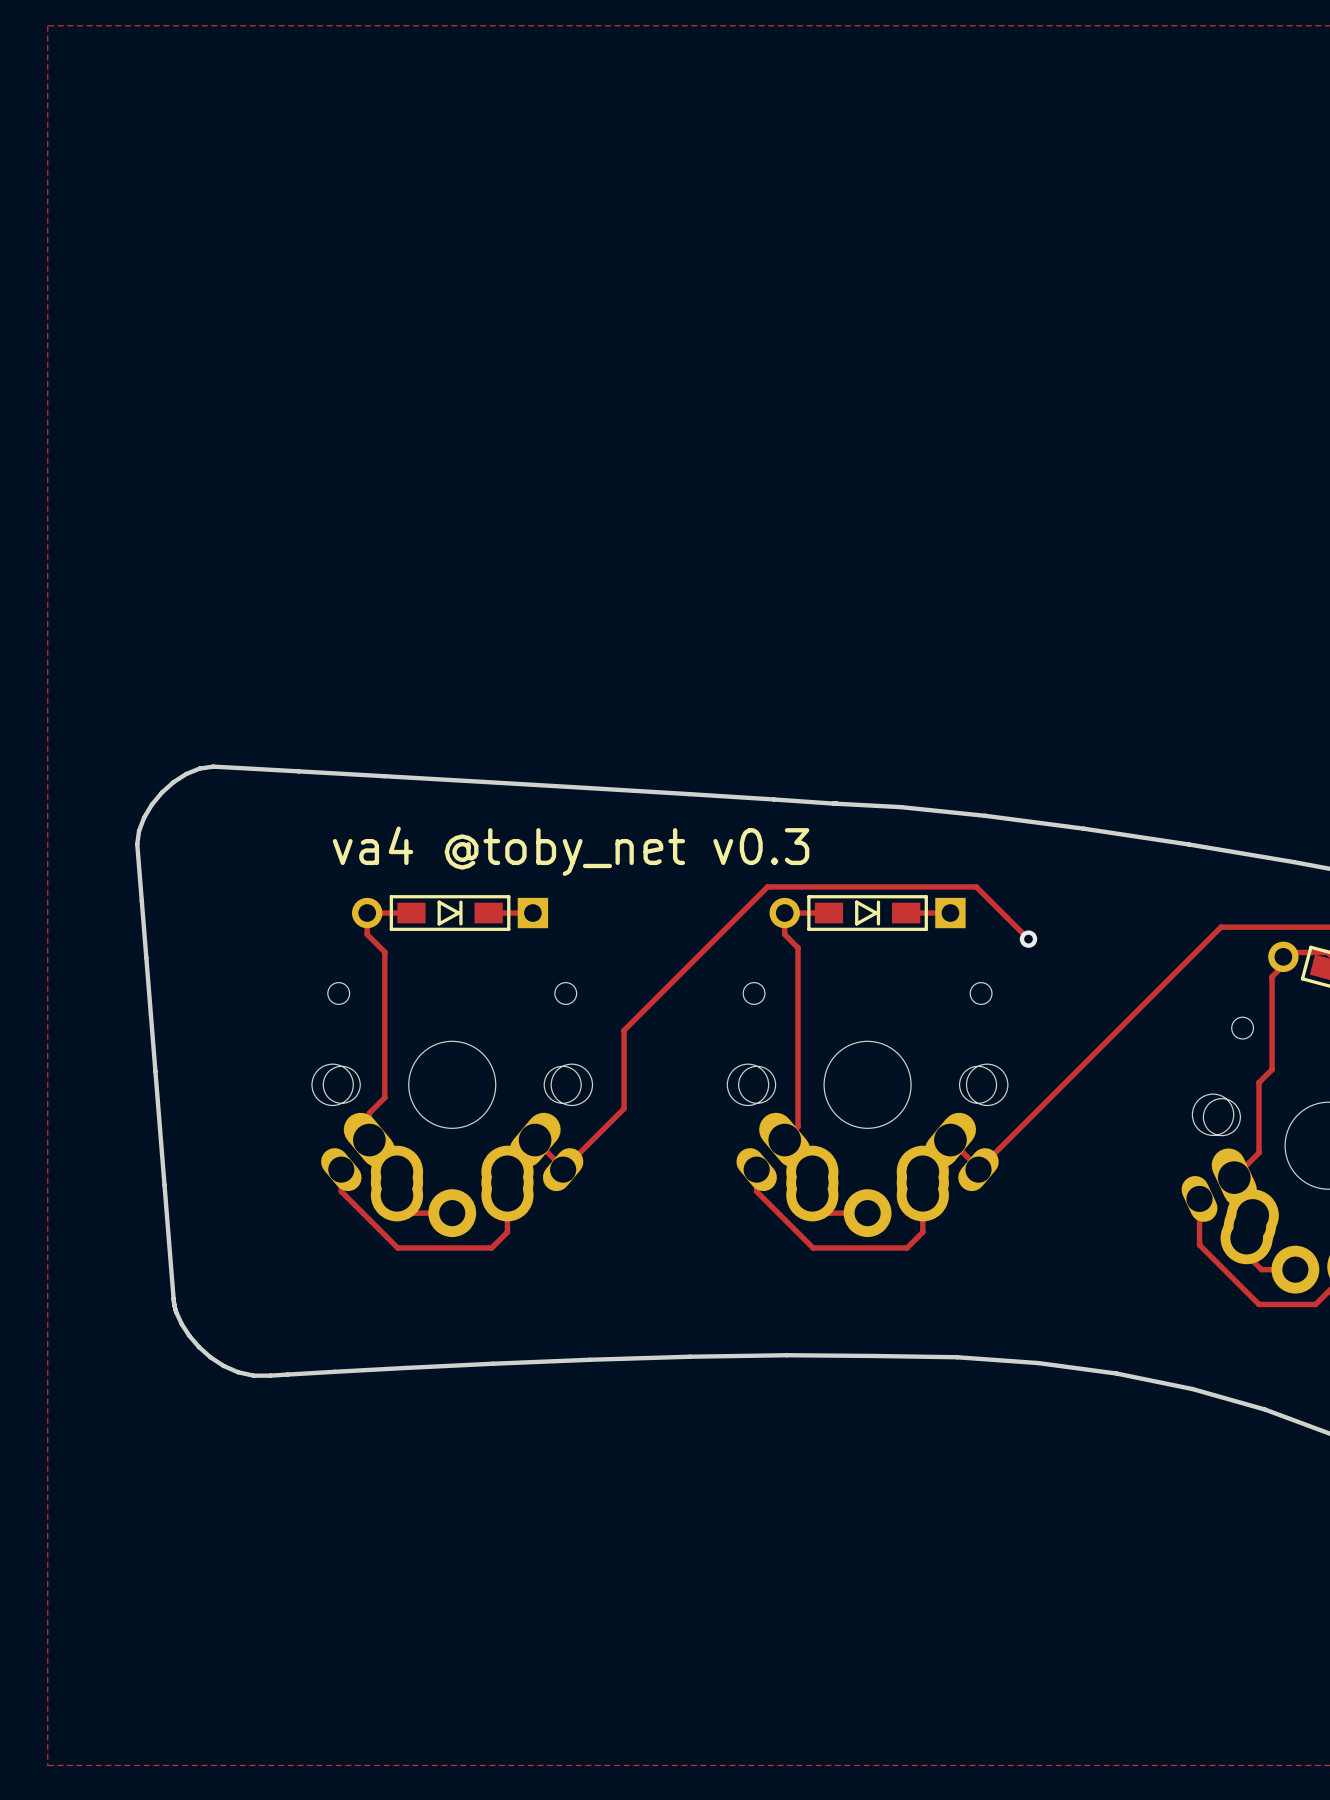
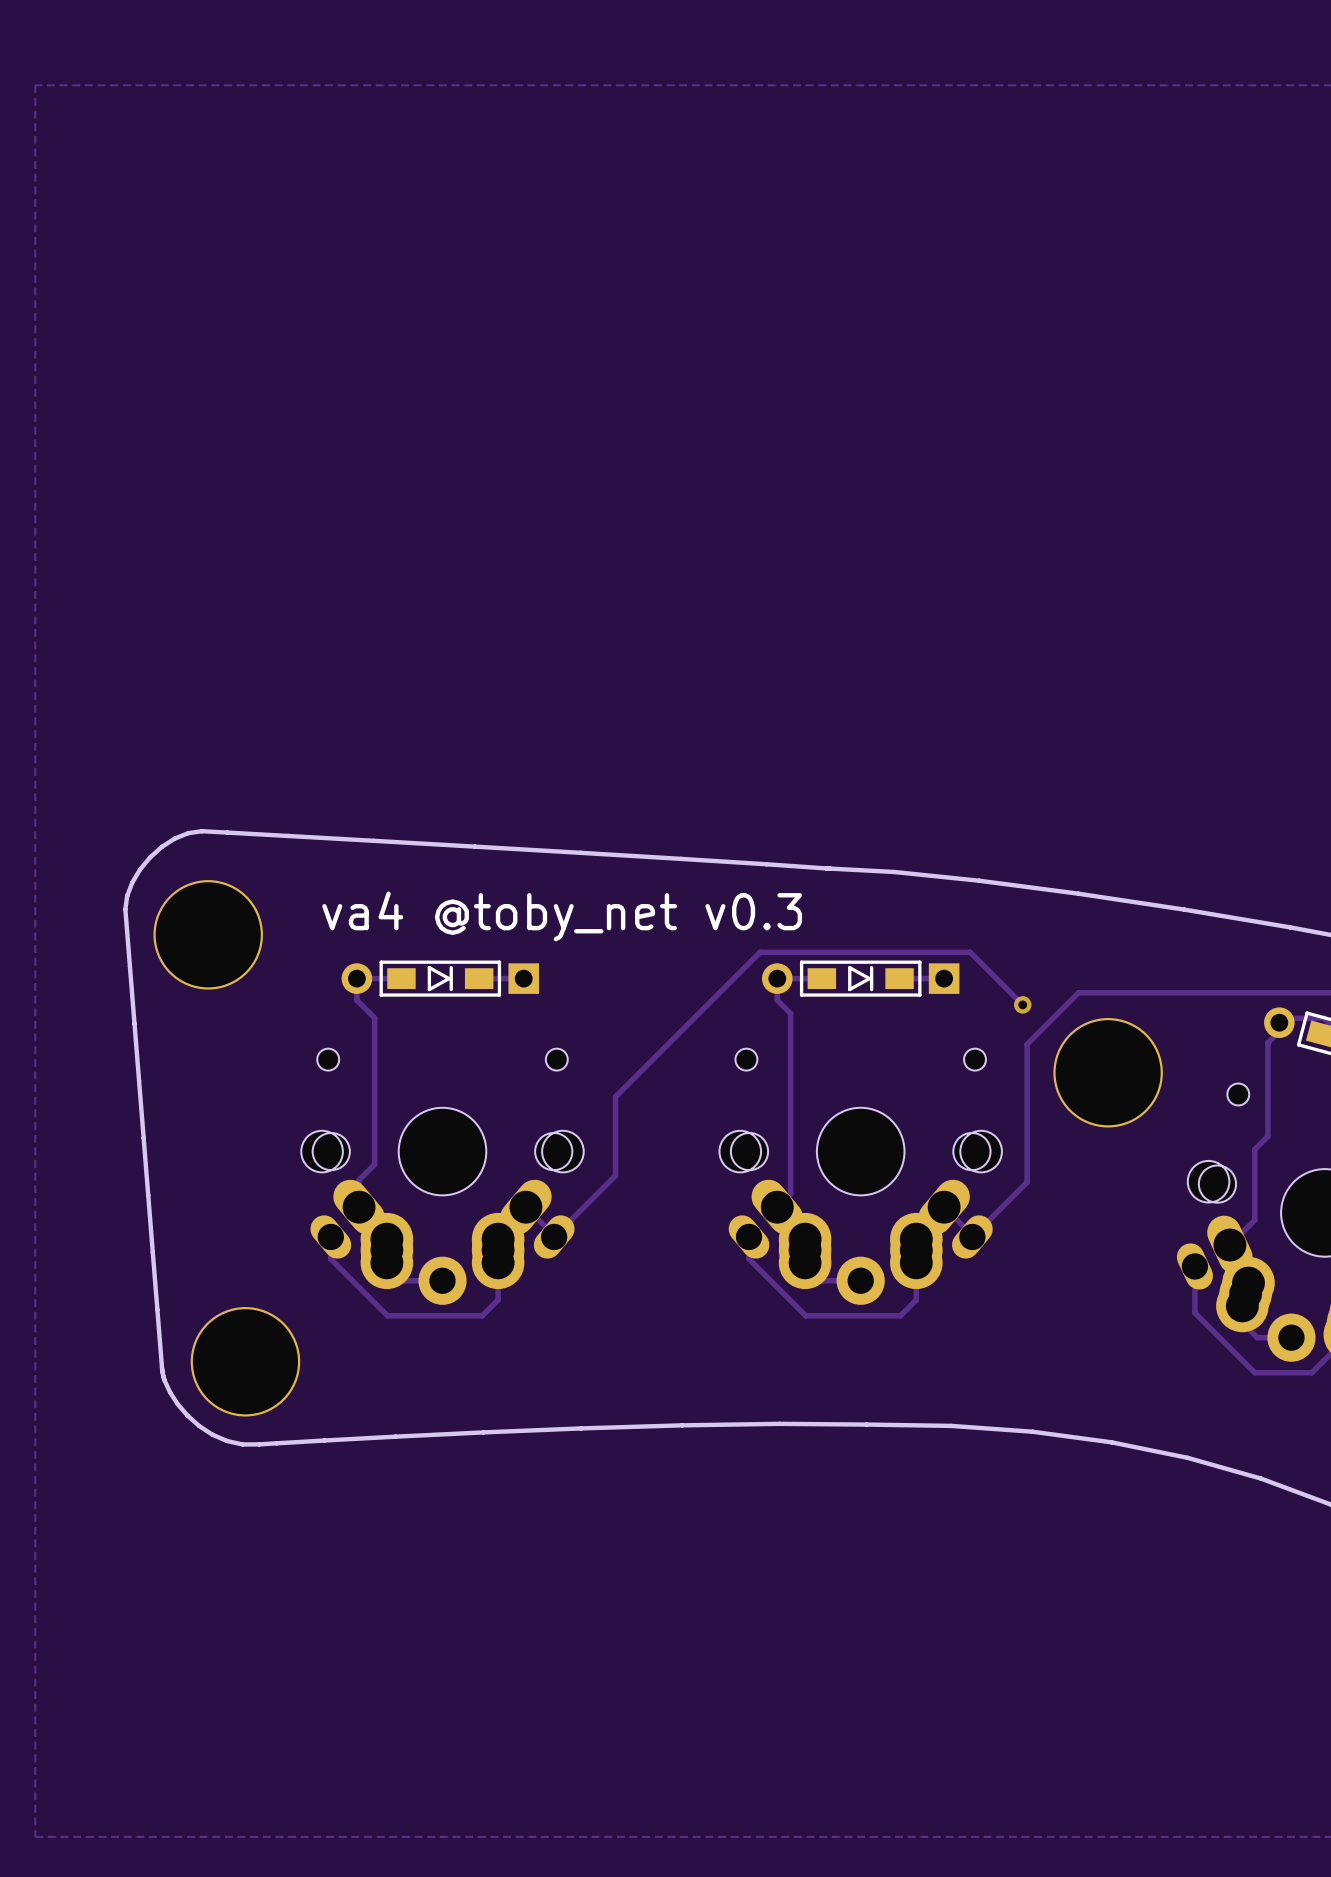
part: none -> (208, 934)
track: (1220, 927) (1032, 1115) -> (1216, 992) (1078, 992) (1027, 1044) (1027, 1182)
part: none -> (1108, 1072)
part: none -> (245, 1361)

